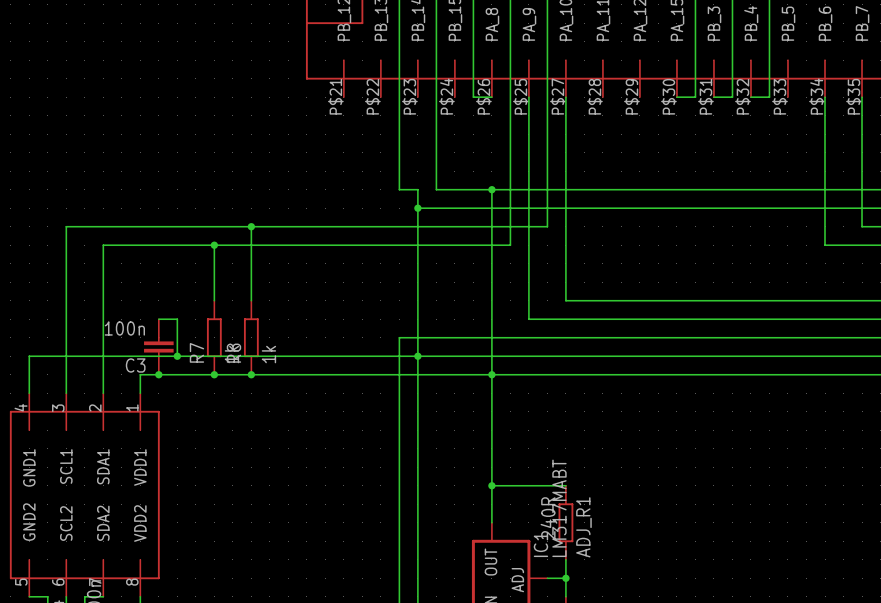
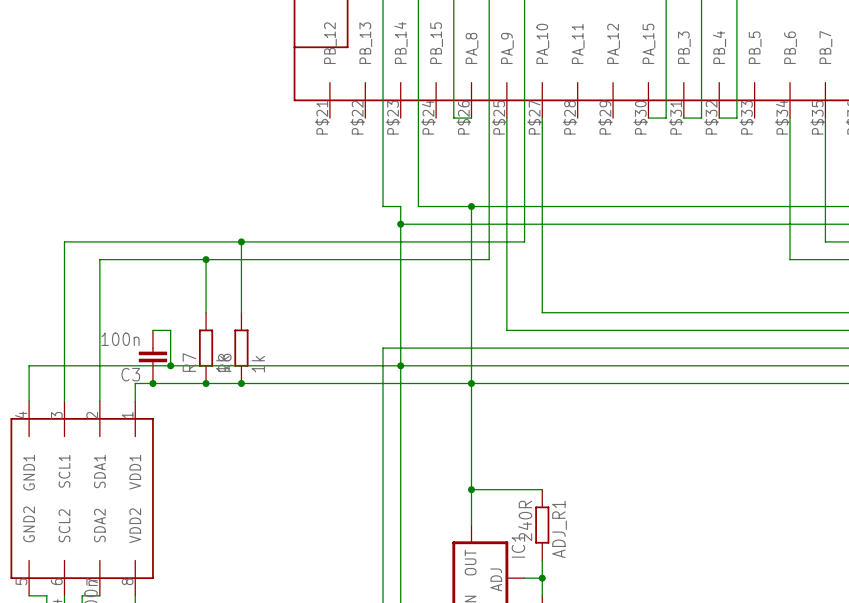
IC1 value: LM317MABT (559, 508) -> none

